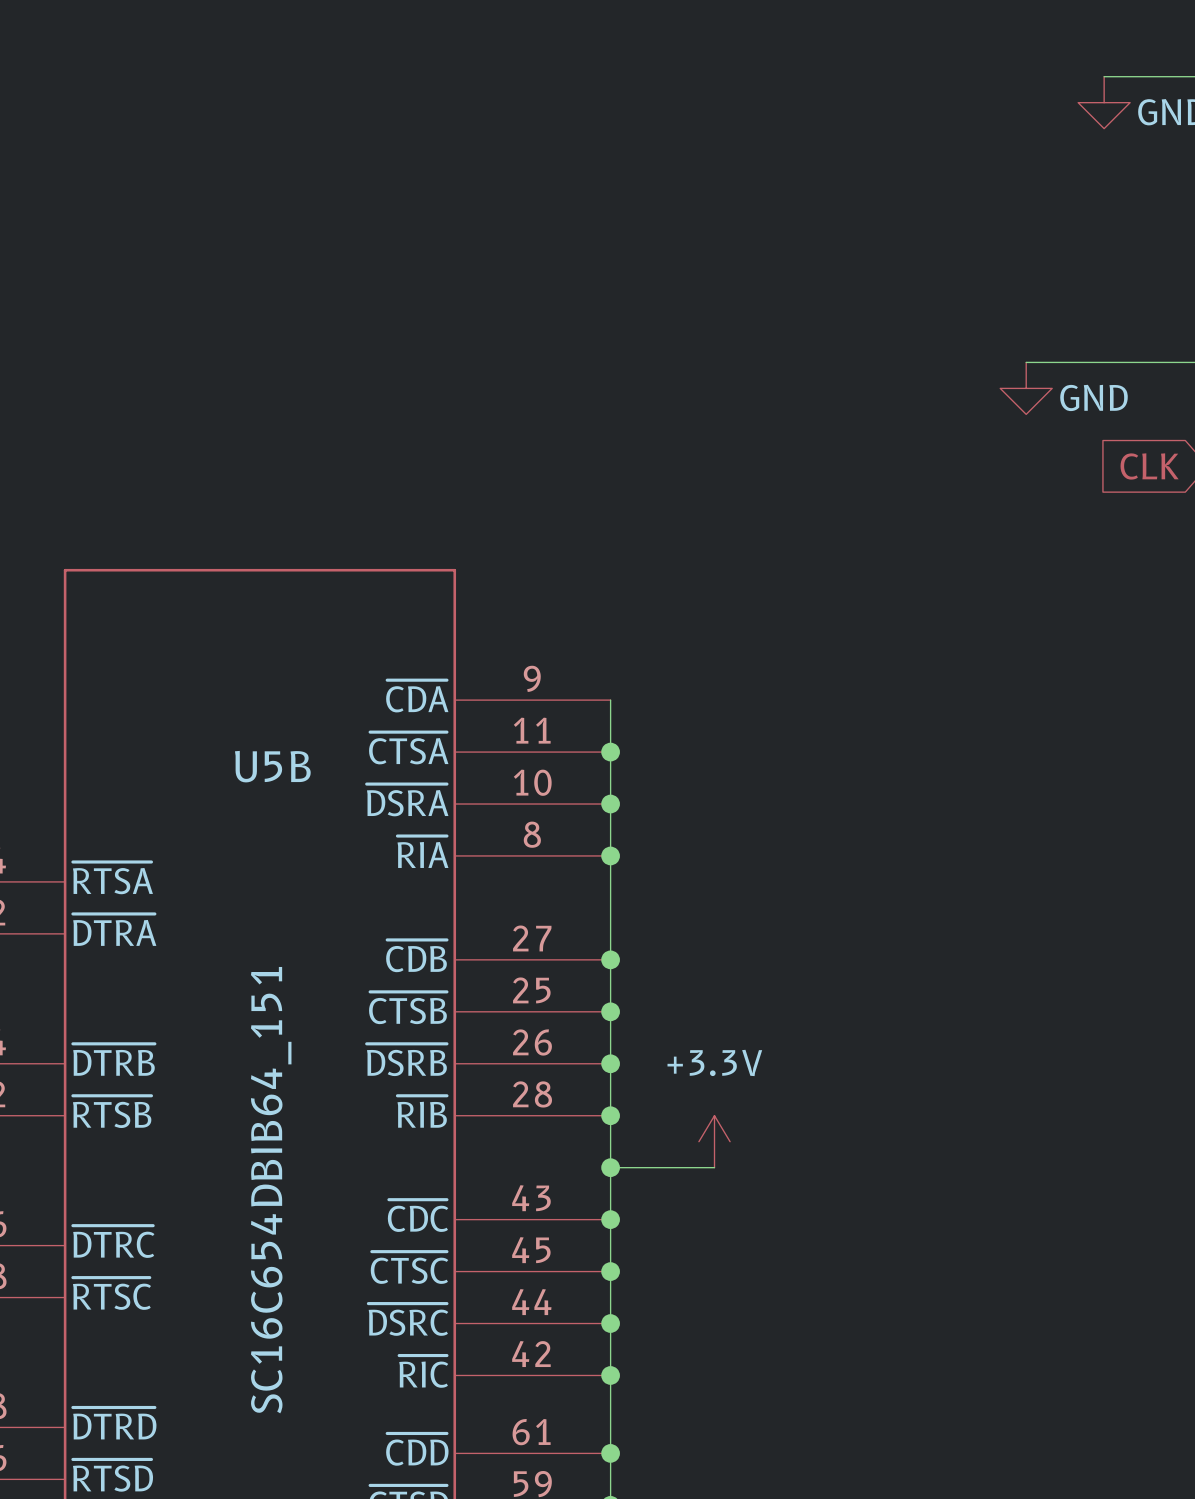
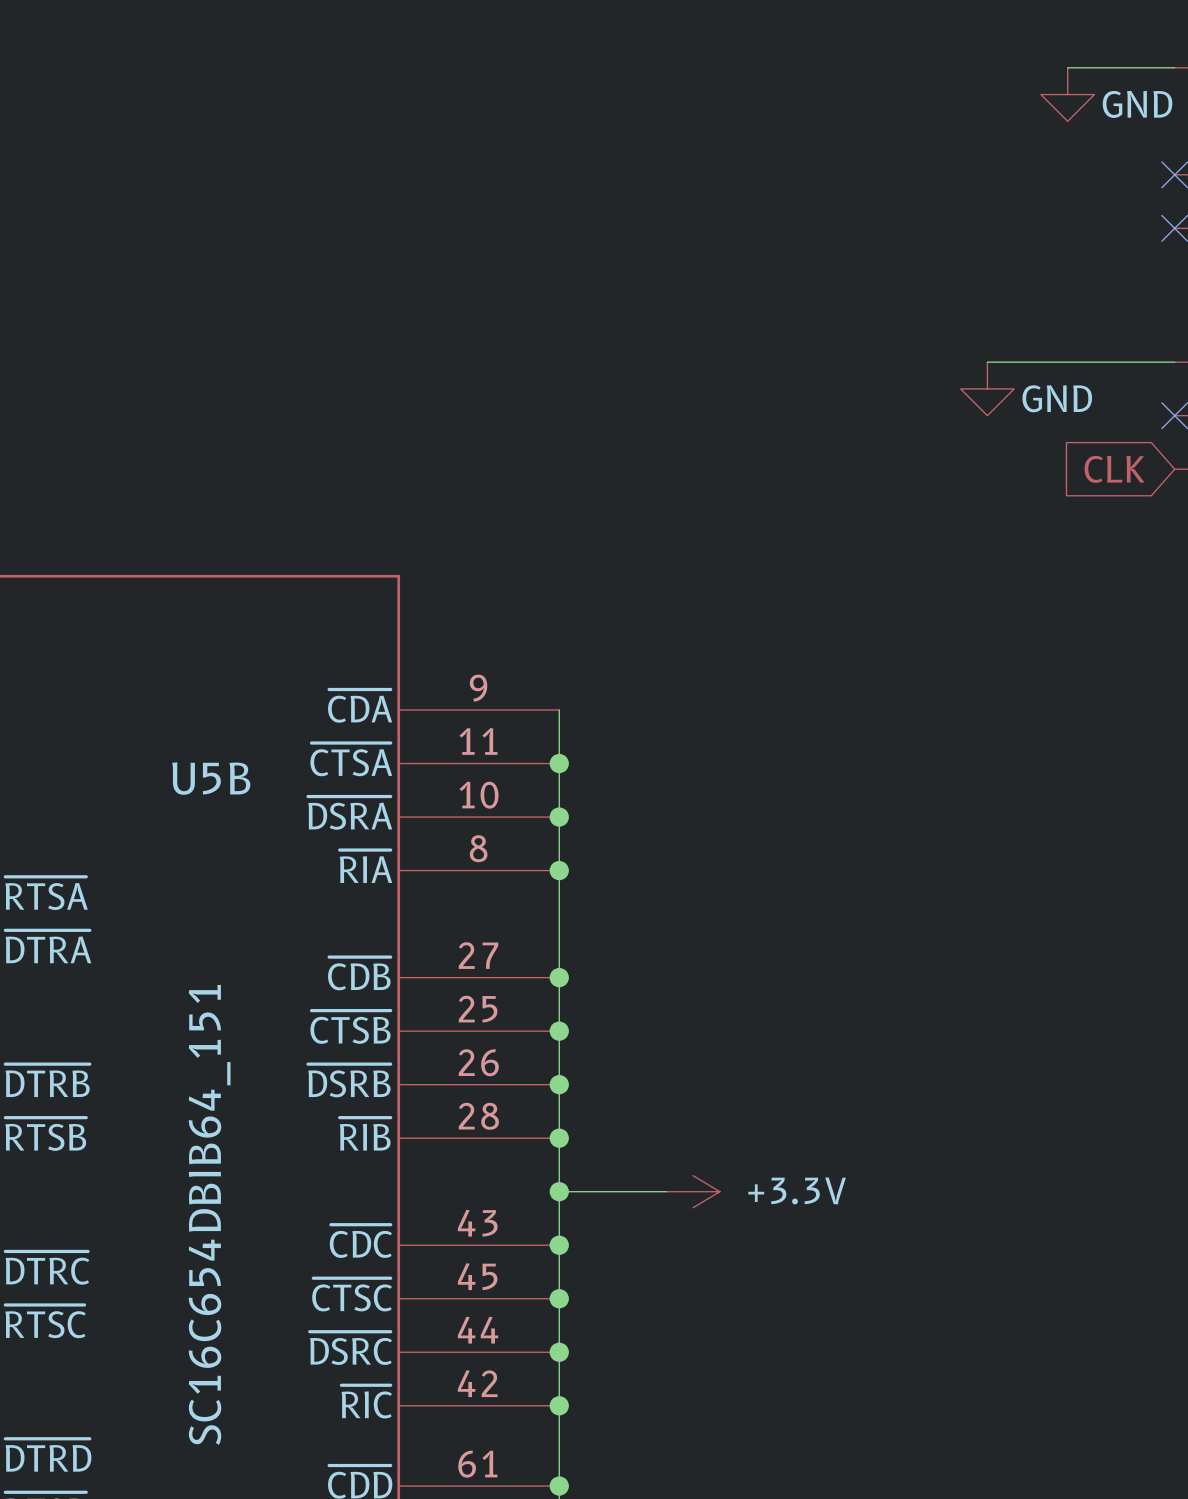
power symbol text position: +3.3V (714, 1062) -> +3.3V (797, 1190)
power symbol rotation: 0° (714, 1141) -> 90° clockwise (693, 1191)
power symbol position: +3.3V (714, 1141) -> +3.3V (693, 1191)

